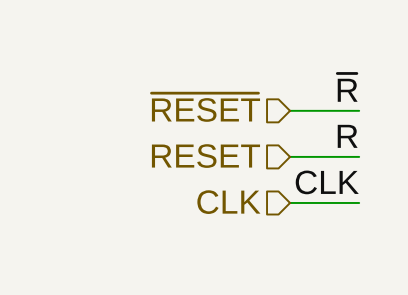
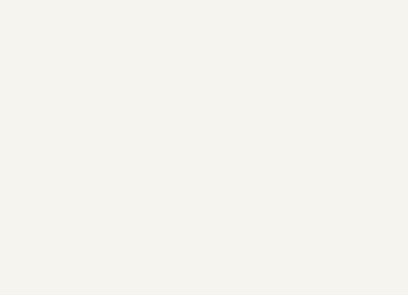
label: ~{R} (347, 87) -> none
hierarchical label: ~{RESET} (205, 107) -> none
wire: (290, 110) (359, 110) -> none
label: R (347, 136) -> none
hierarchical label: RESET (205, 156) -> none
wire: (290, 156) (359, 156) -> none
label: CLK (327, 182) -> none
hierarchical label: CLK (228, 202) -> none
wire: (290, 202) (359, 202) -> none

